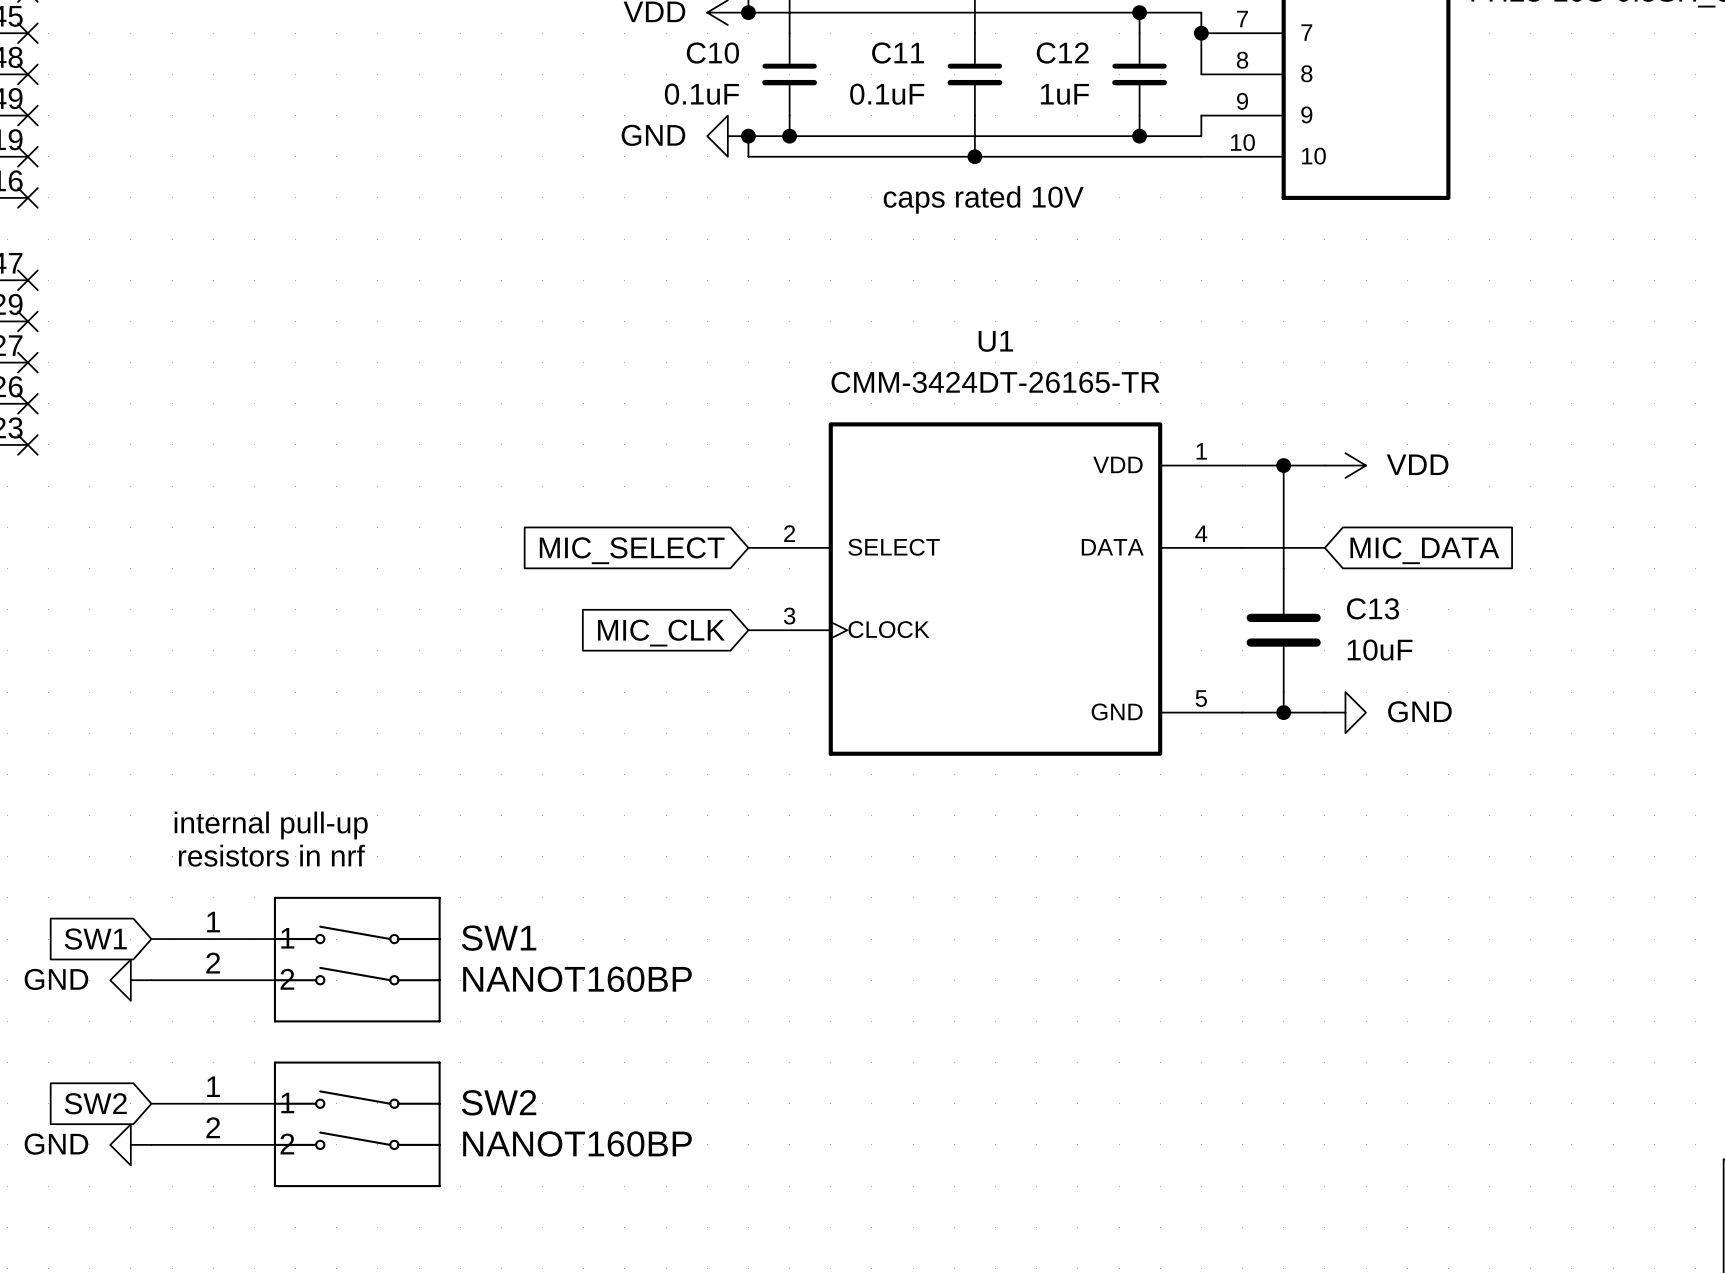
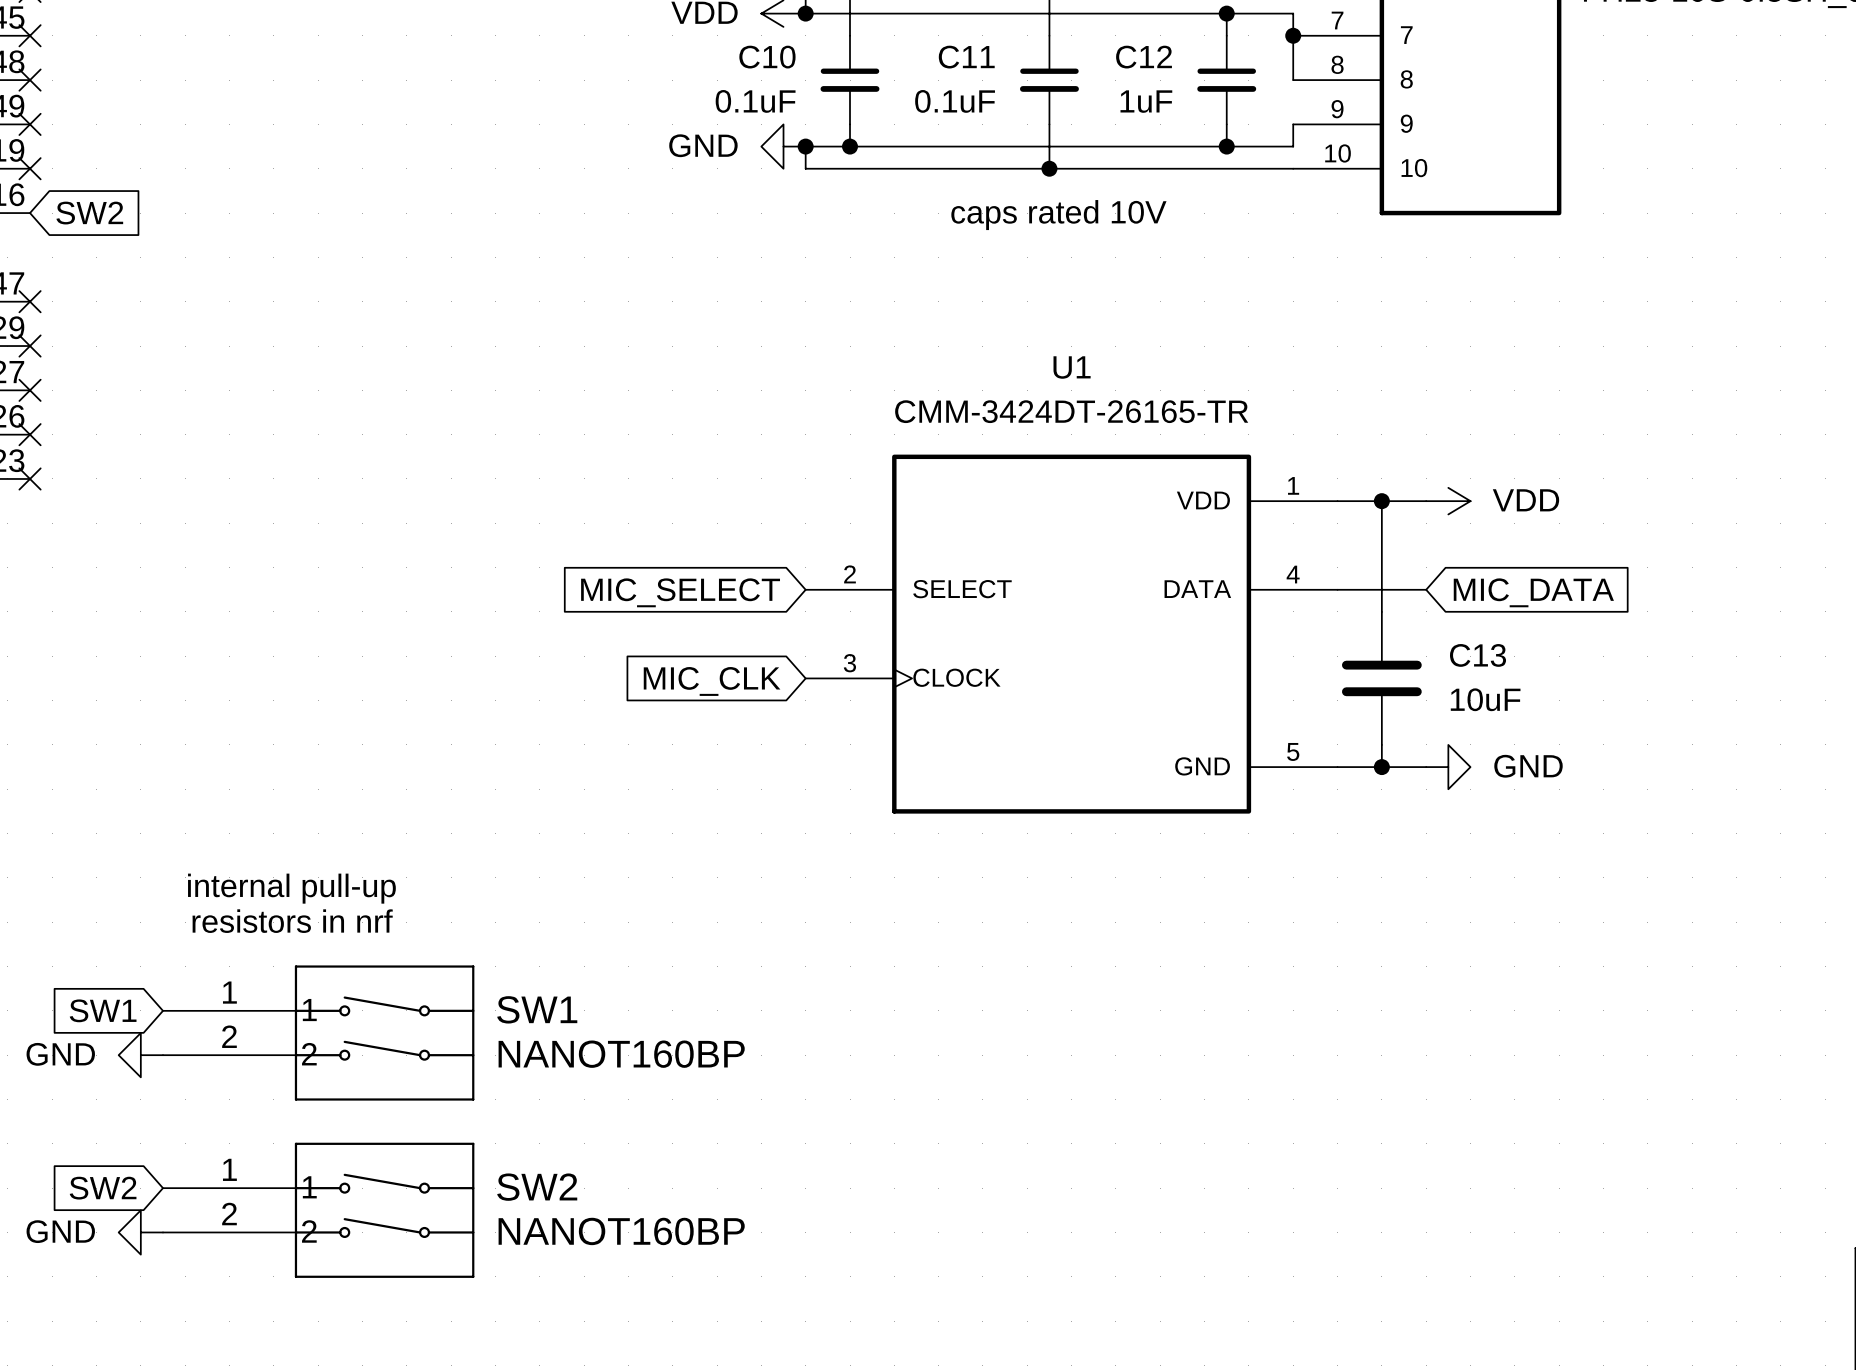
no-connect mark: (27, 197) -> none
global label: none -> SW2 (89, 213)

